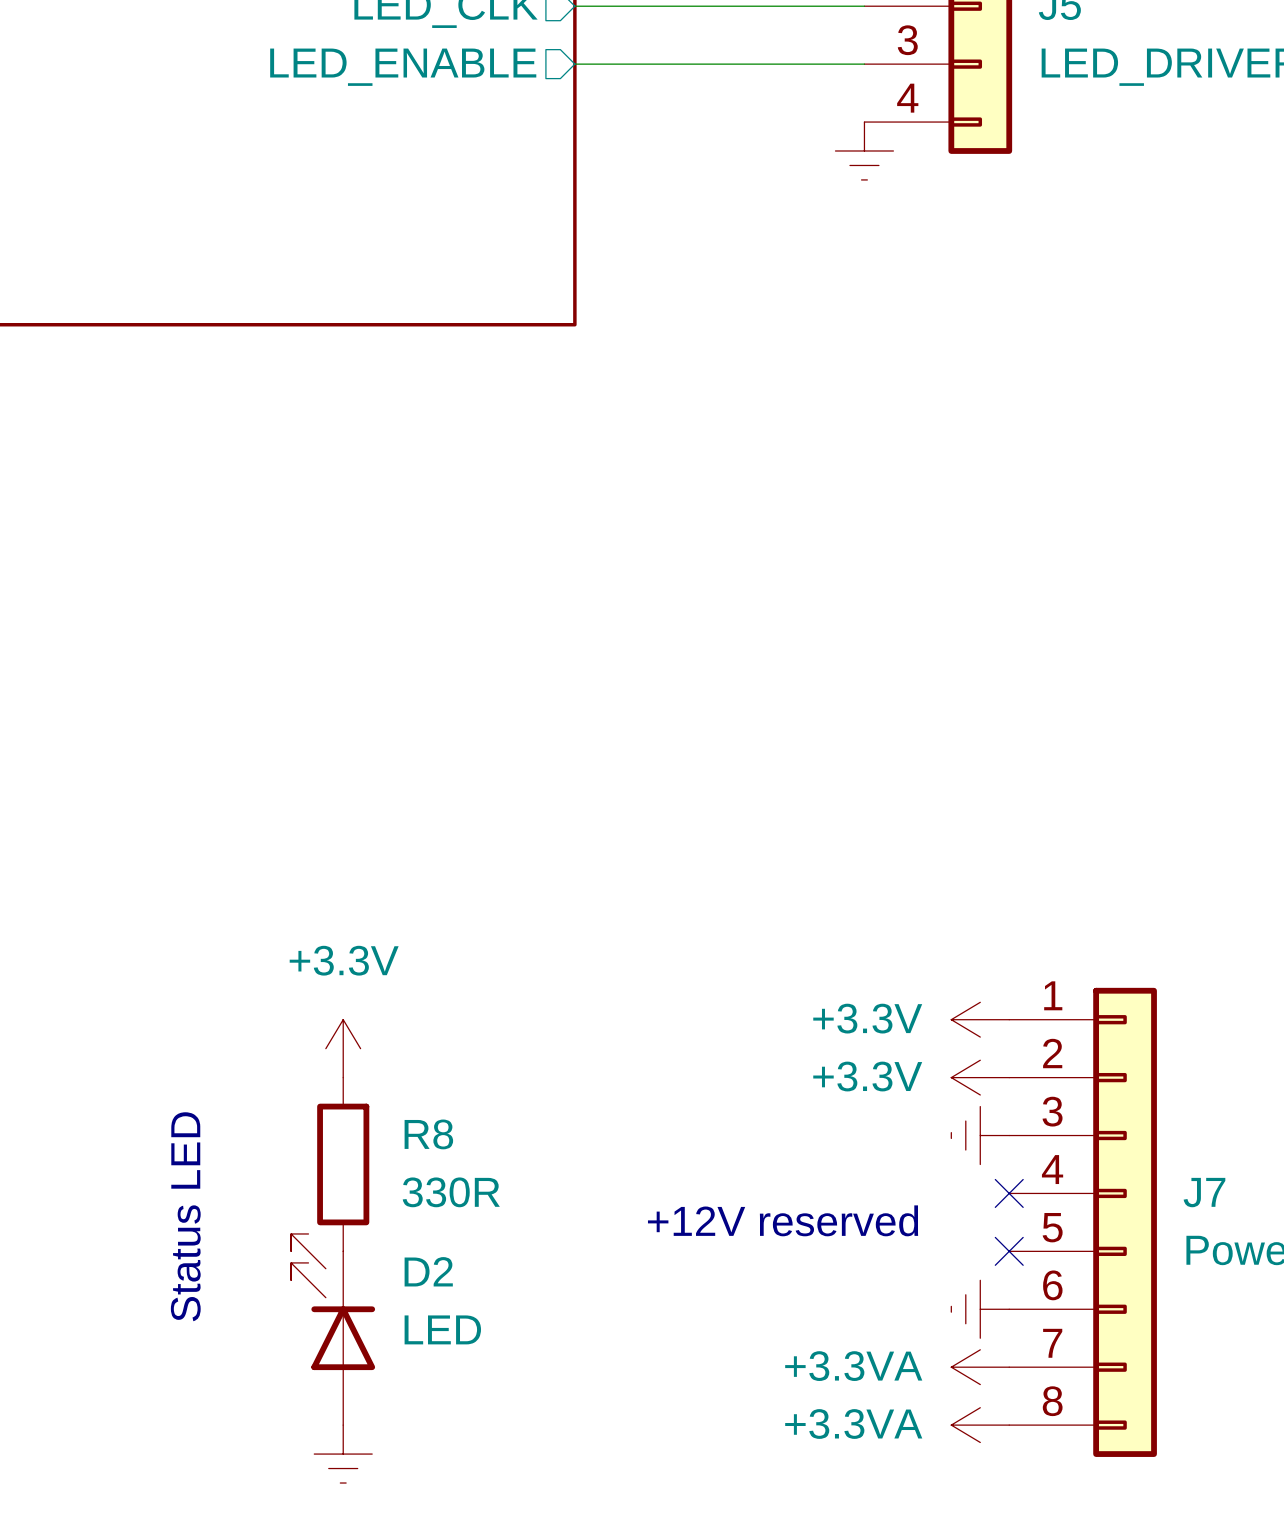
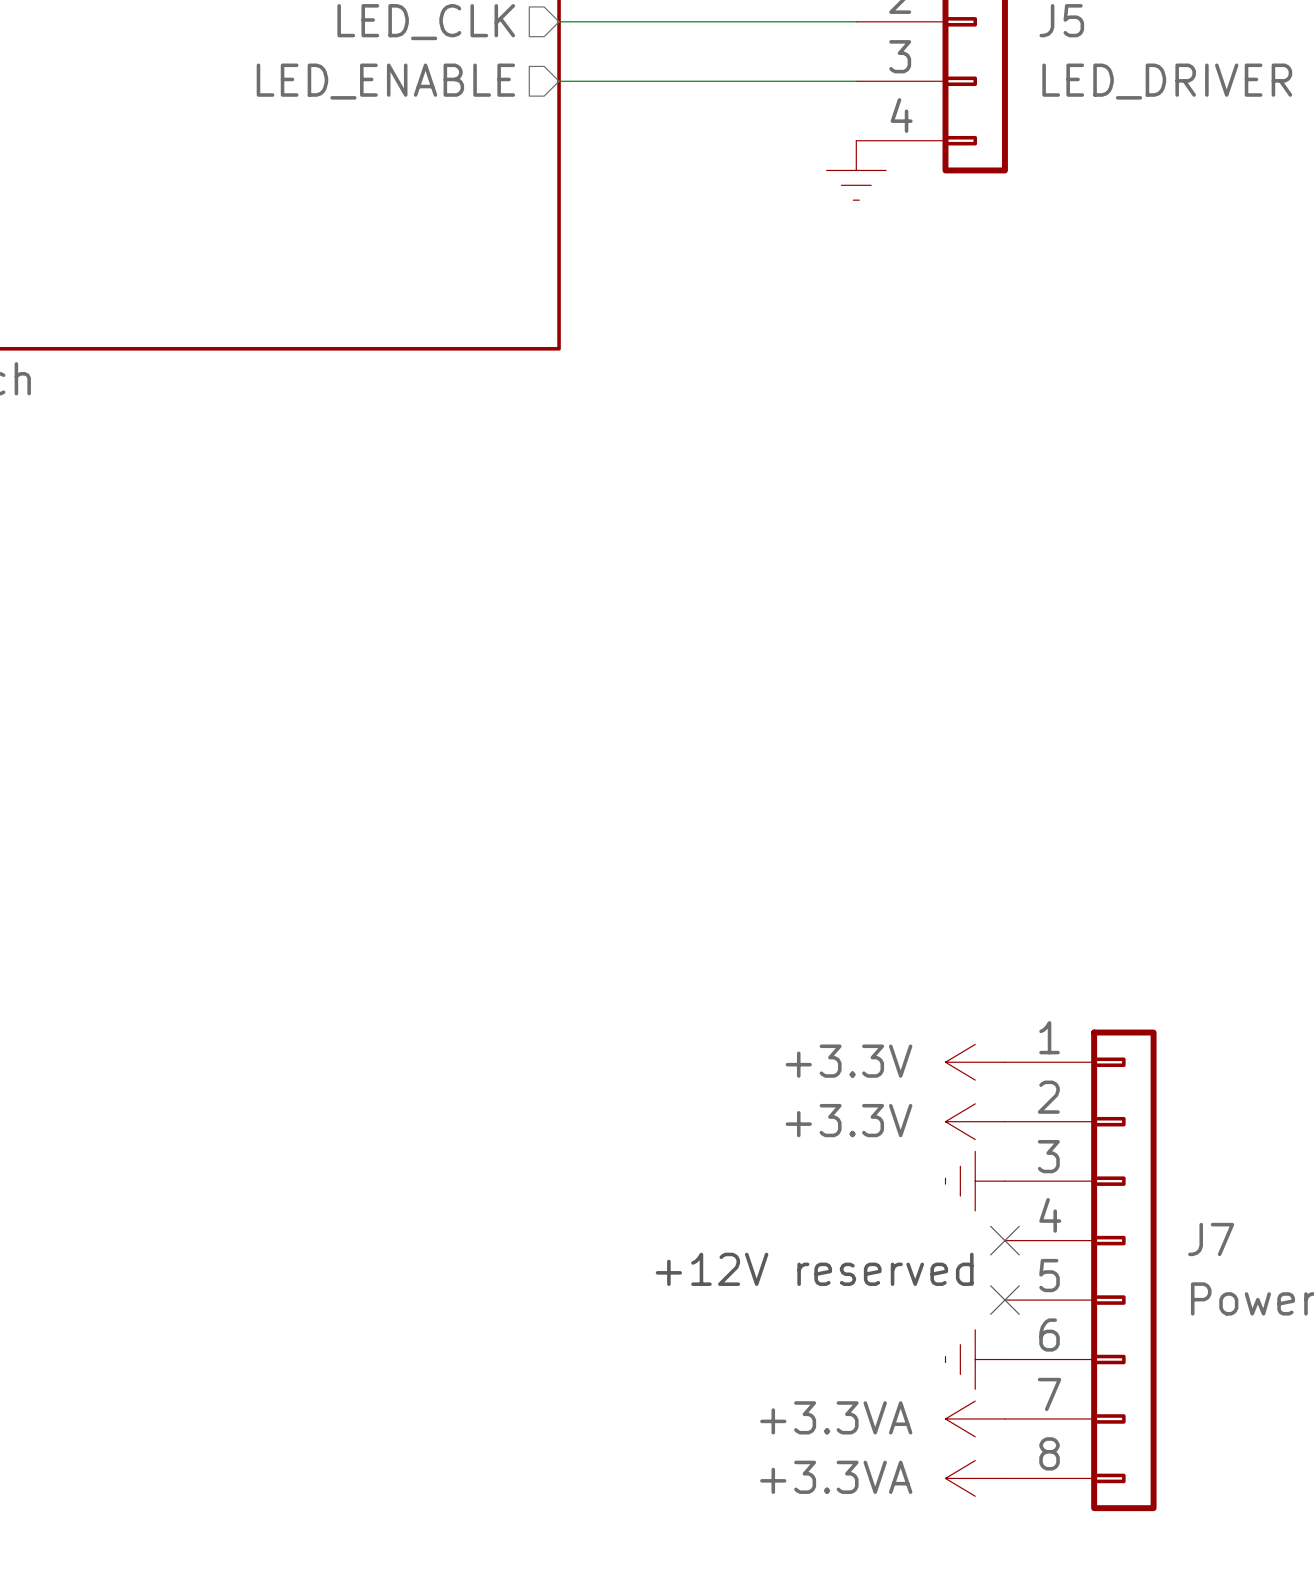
power symbol: +3.3V (343, 1048) -> none
R8: 330R (343, 1164) -> none
text: Status LED (185, 1216) -> none
text position: +12V reserved (783, 1220) -> +12V reserved (814, 1269)
D2: LED (333, 1329) -> none
power symbol: (343, 1454) -> none

